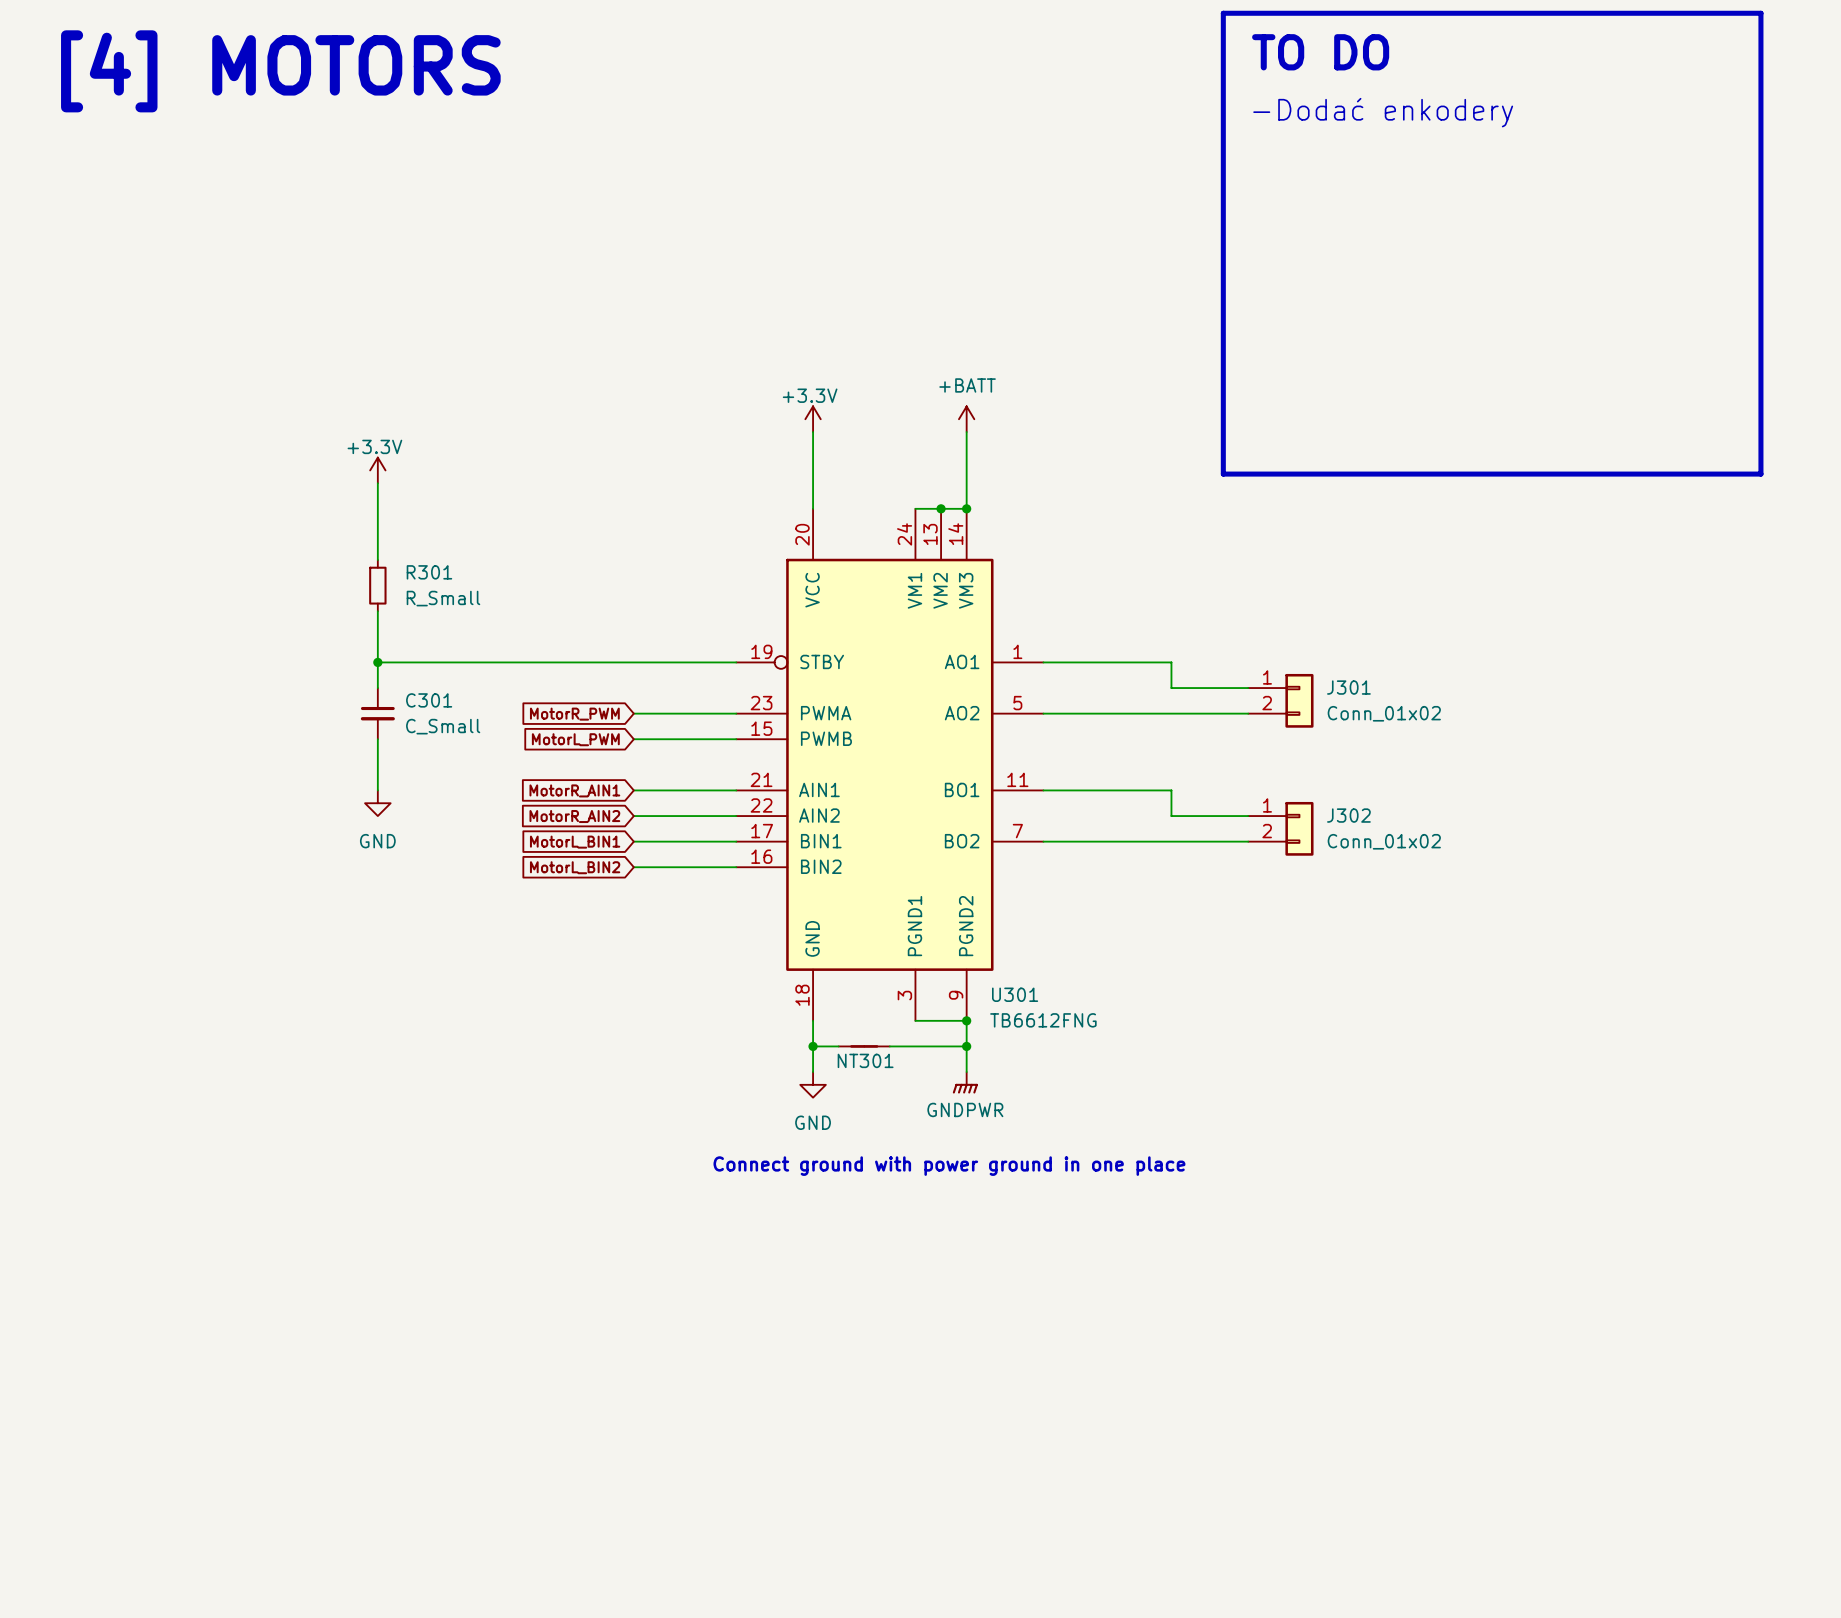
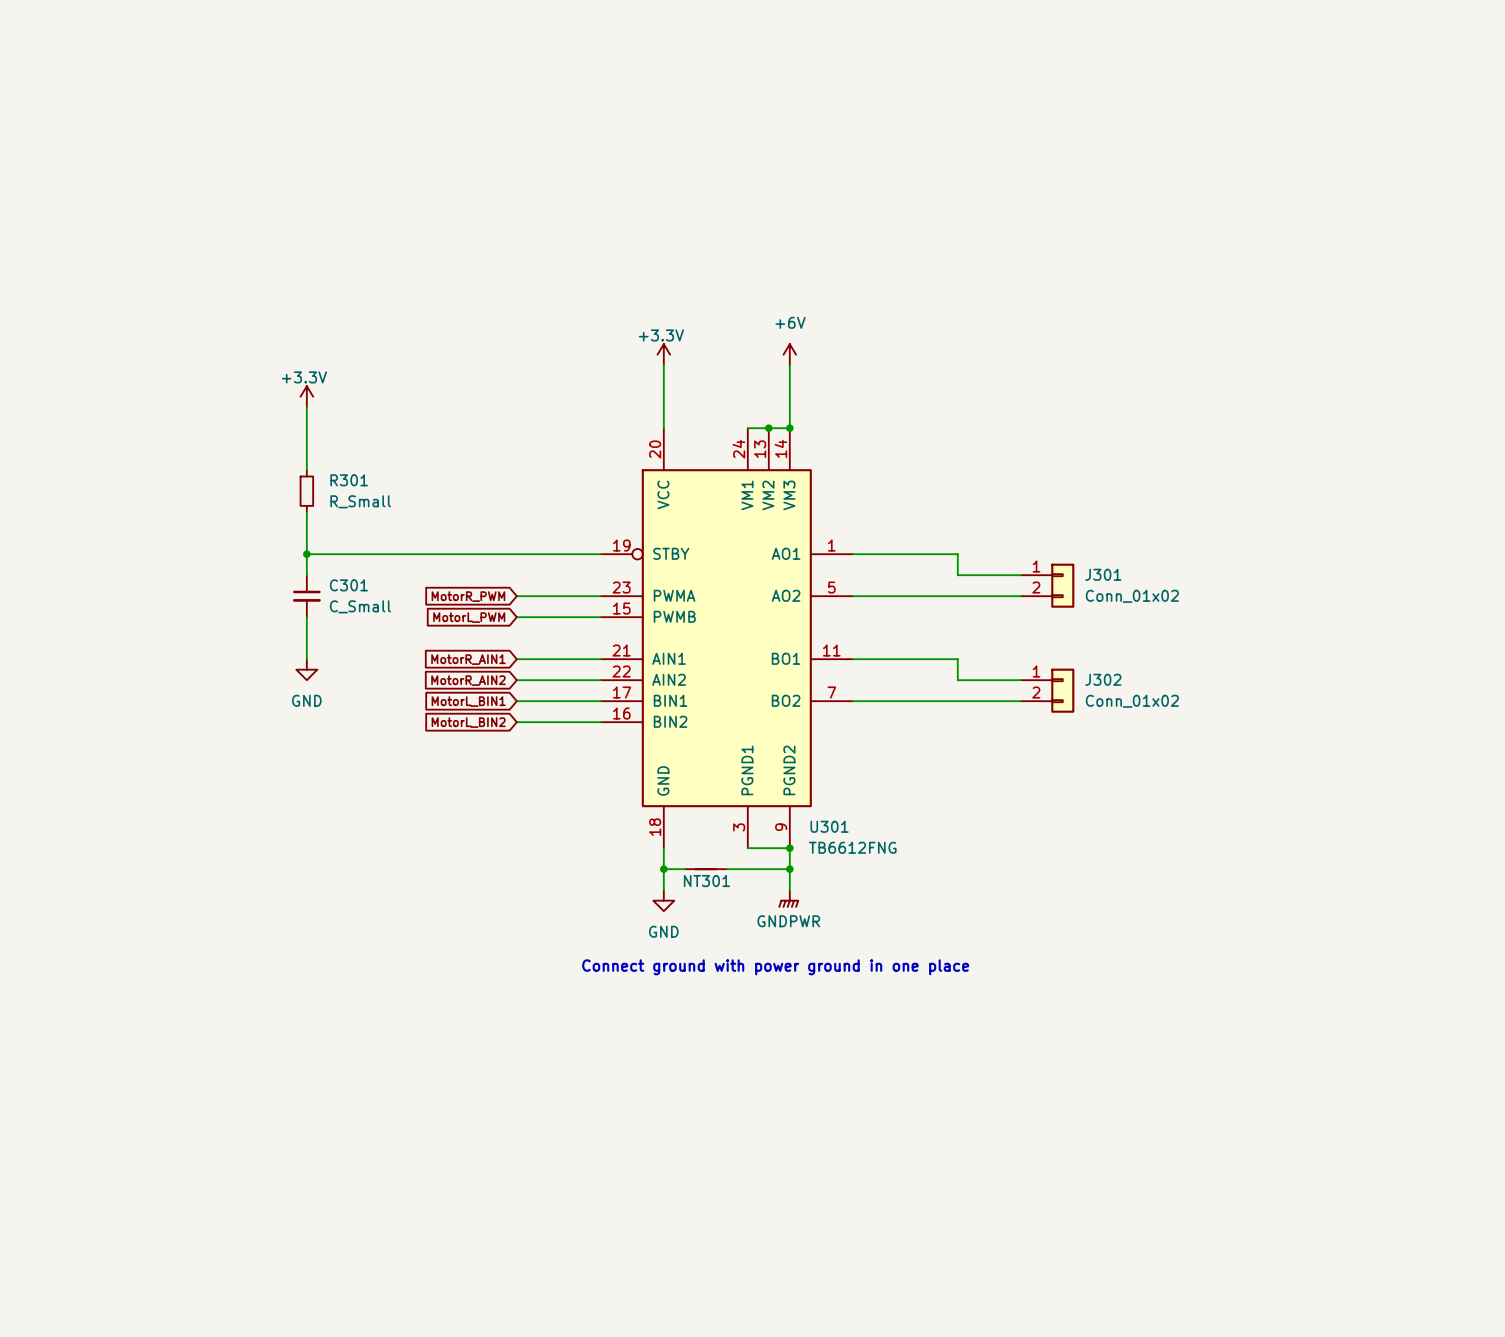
line: (1223, 13) (1760, 13) (1760, 474) (1223, 474) (1223, 13) -> none
text: TO DO (1320, 52) -> none
text: [4] MOTORS (280, 71) -> none
text: -Dodać enkodery (1383, 112) -> none
power symbol: +BATT (966, 419) -> +6V (789, 354)

